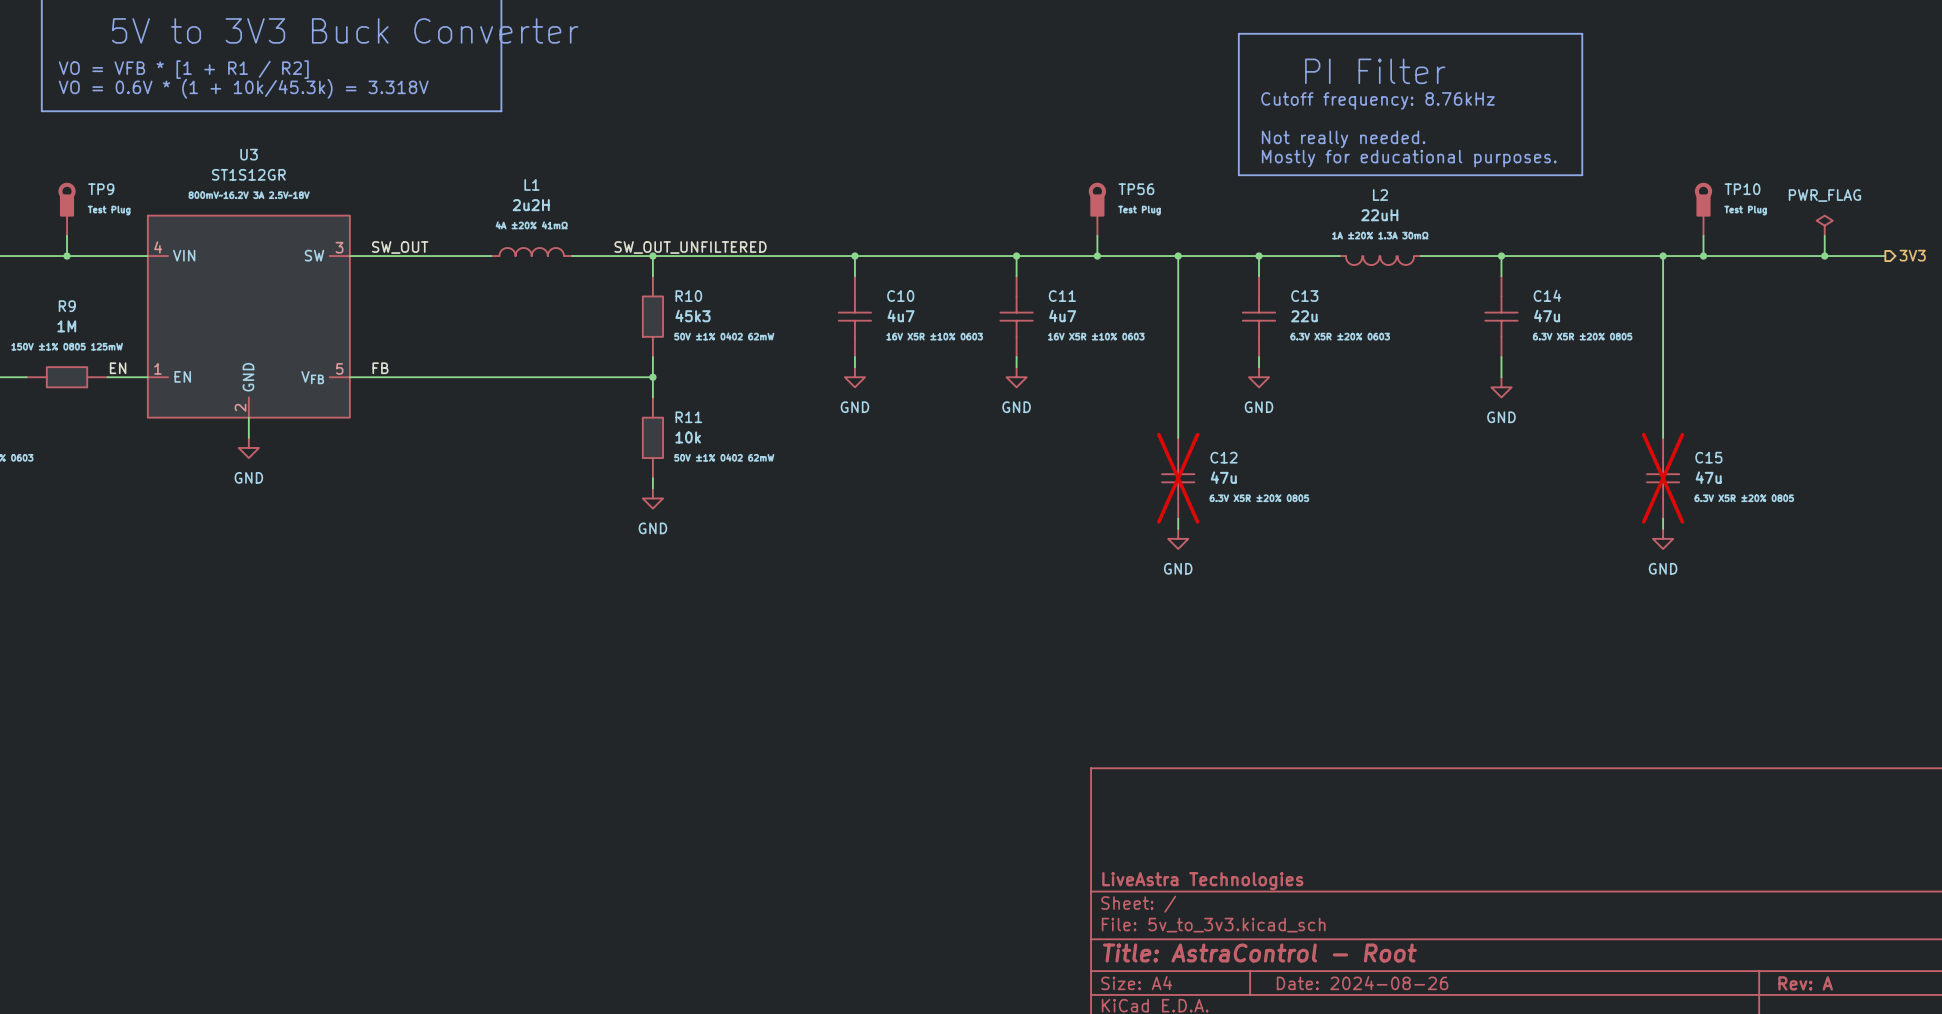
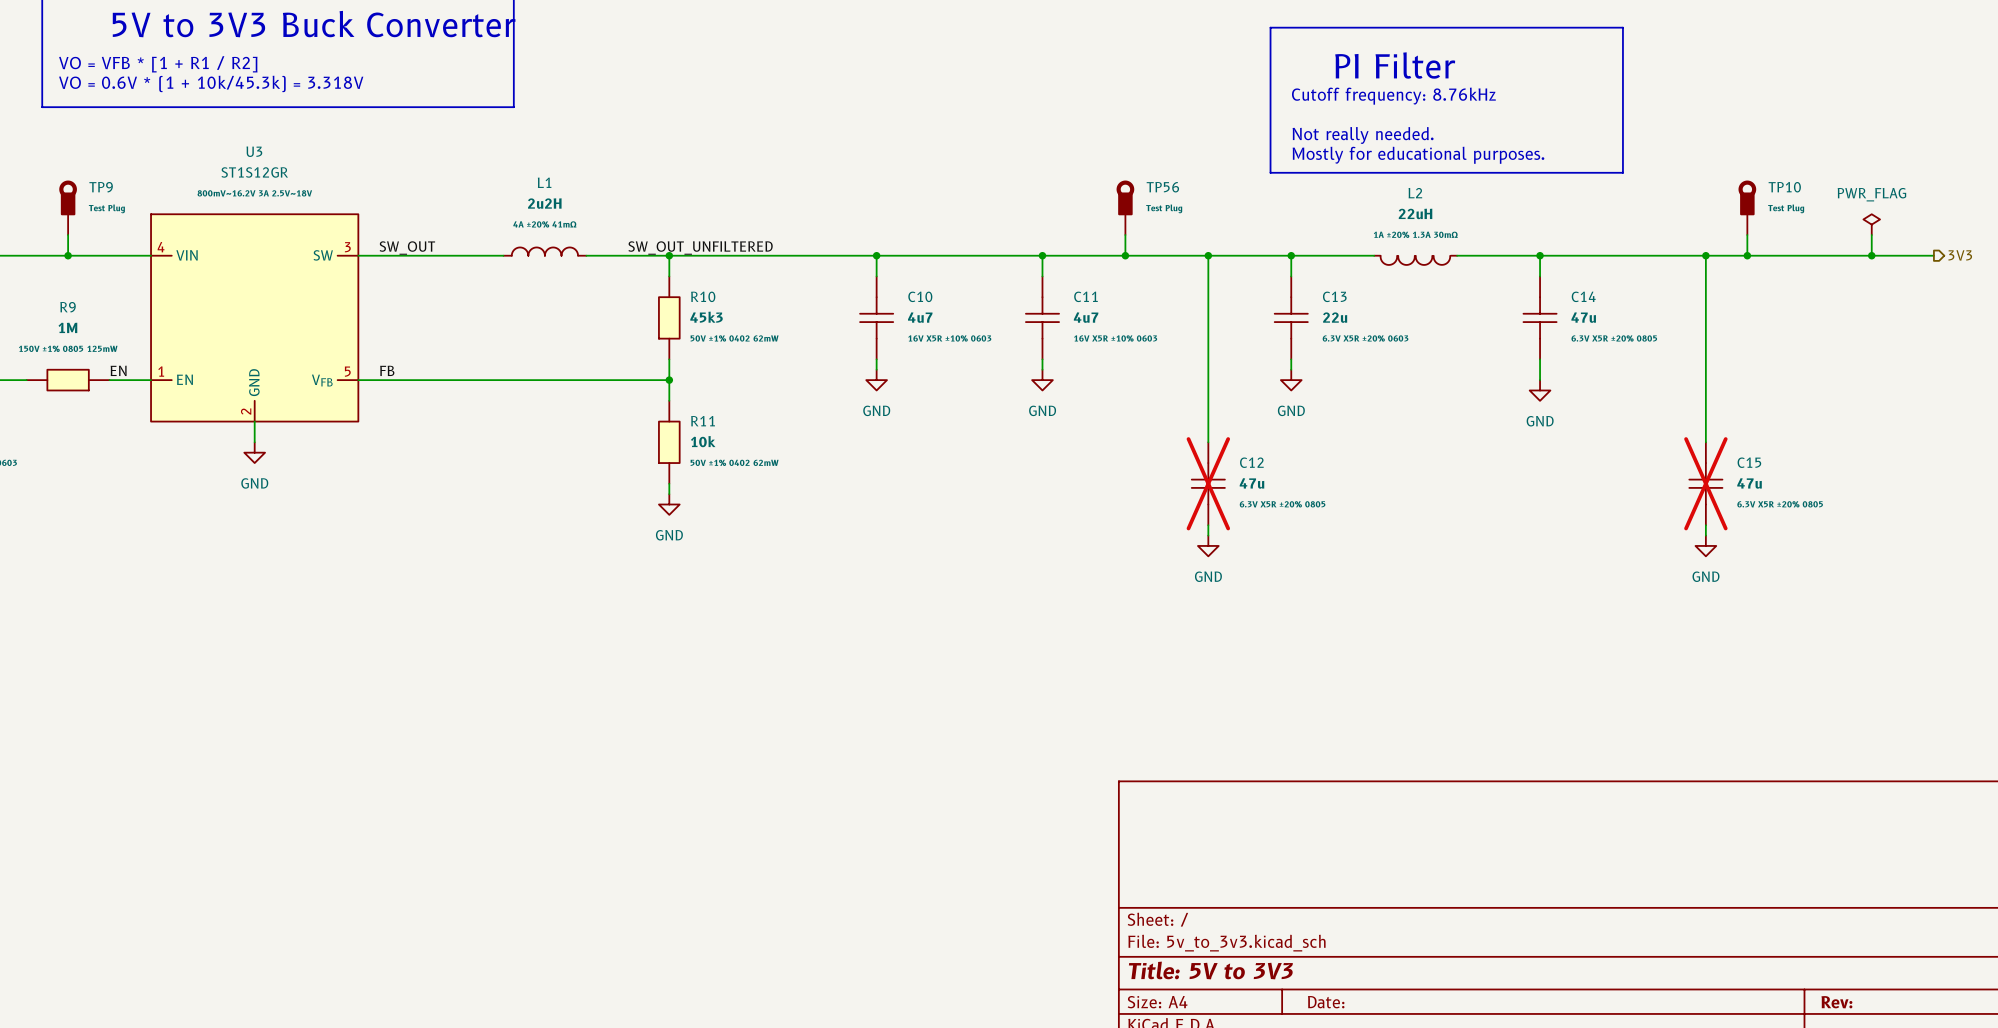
title block: LiveAstra Technologies (1202, 881) -> none
title block: Title: AstraControl - Root (1259, 953) -> Title: 5V to 3V3 (1210, 970)
title block: Date: 2024-08-26 (1362, 983) -> Date: (1326, 1002)
title block: Rev: A (1805, 983) -> Rev: (1836, 1002)

